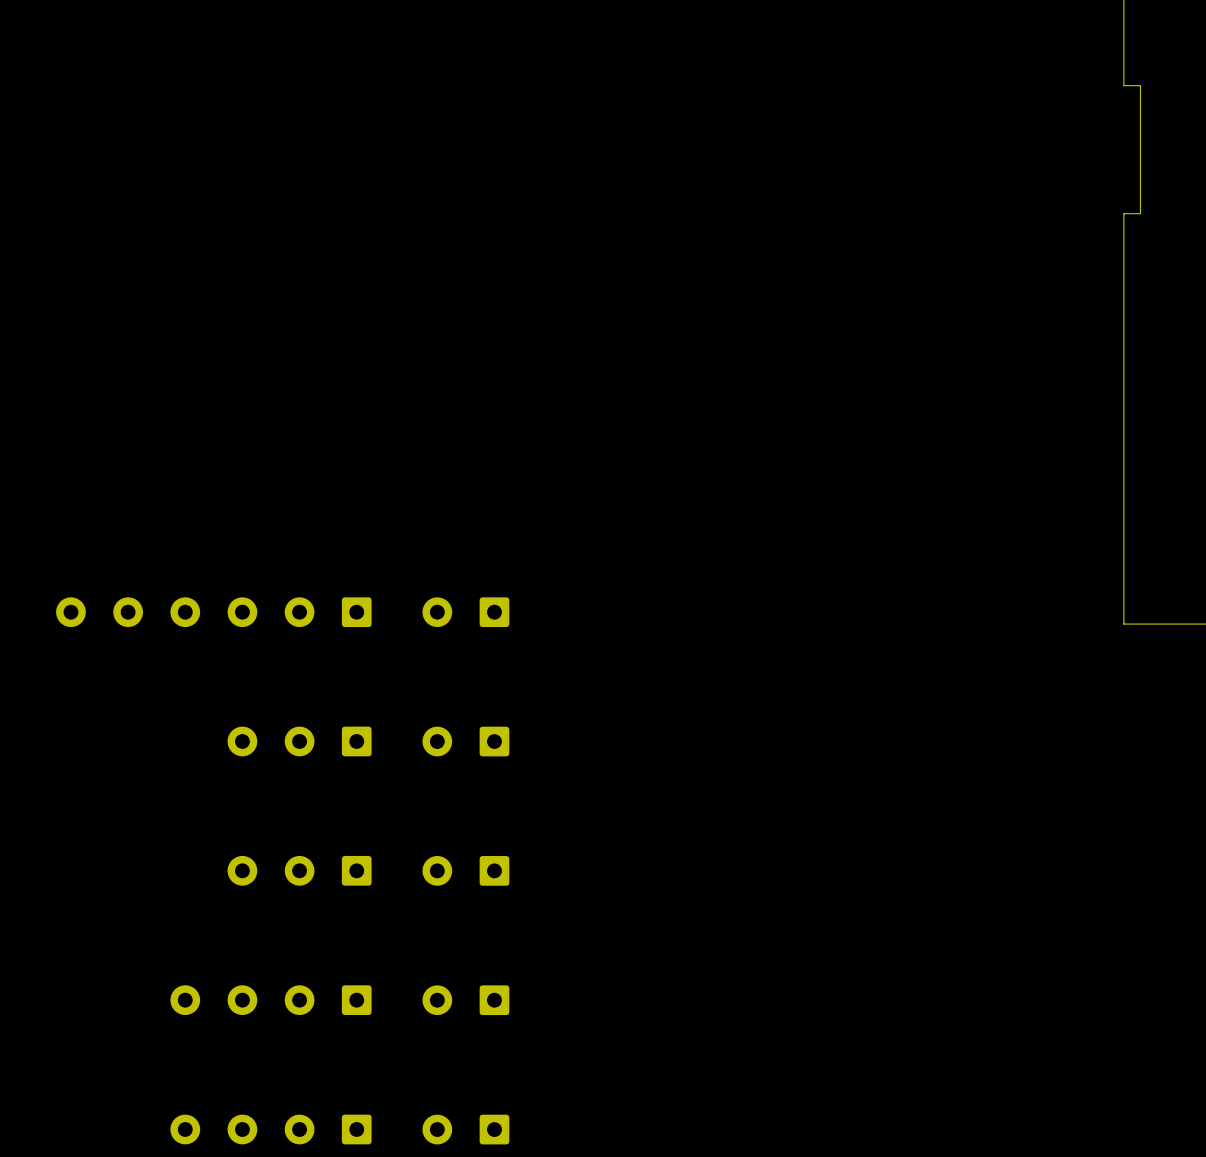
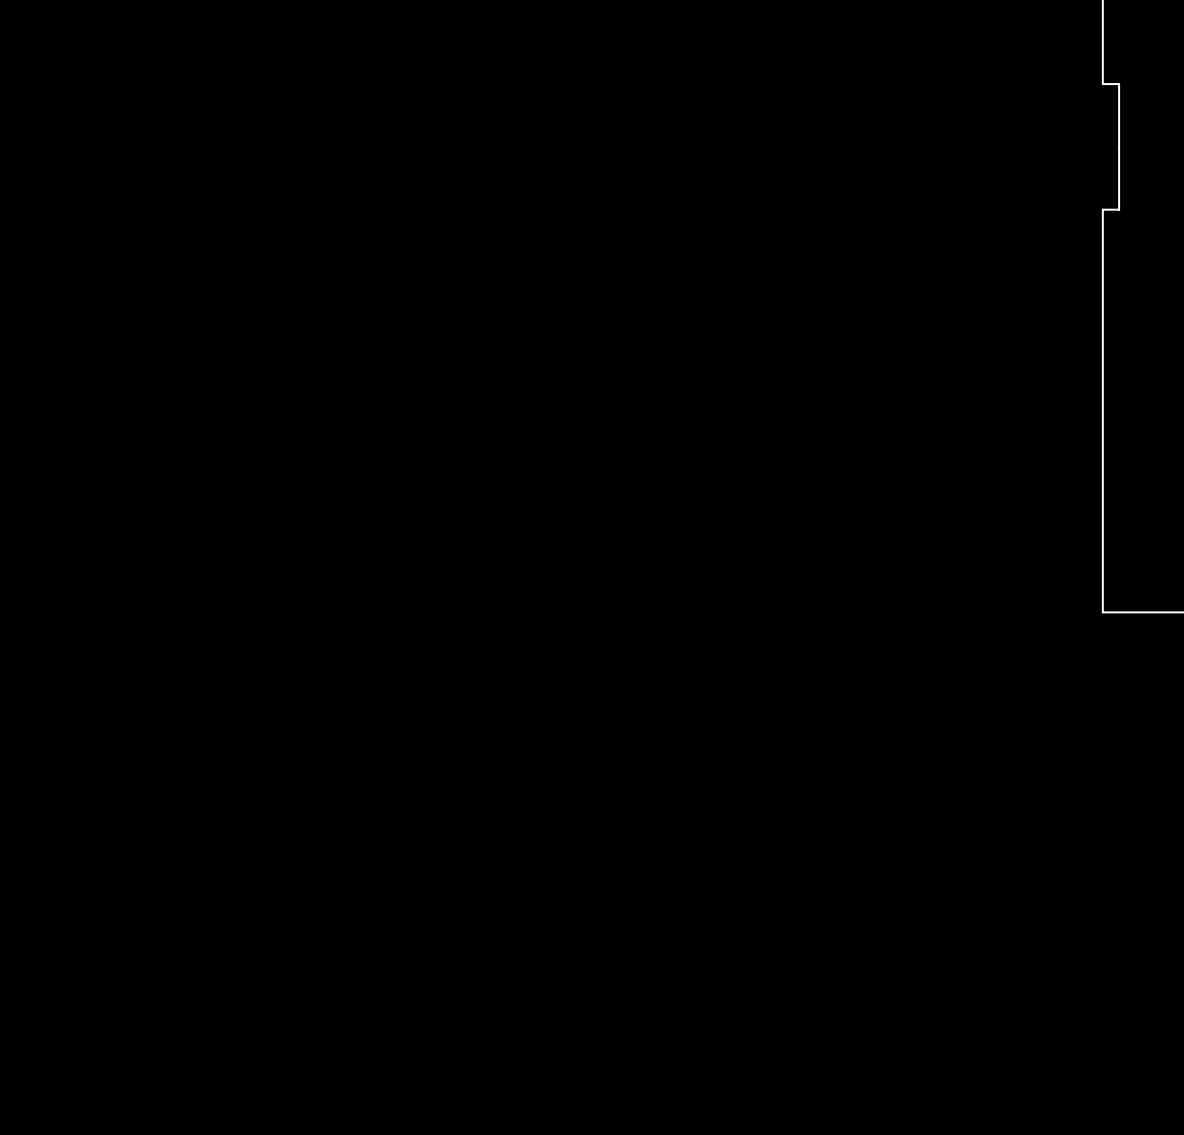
part: (213, 612) -> none
part: (465, 612) -> none
part: (299, 741) -> none
part: (465, 741) -> none
part: (299, 870) -> none
part: (465, 870) -> none
part: (271, 1000) -> none
part: (465, 1000) -> none
part: (271, 1129) -> none
part: (465, 1129) -> none

